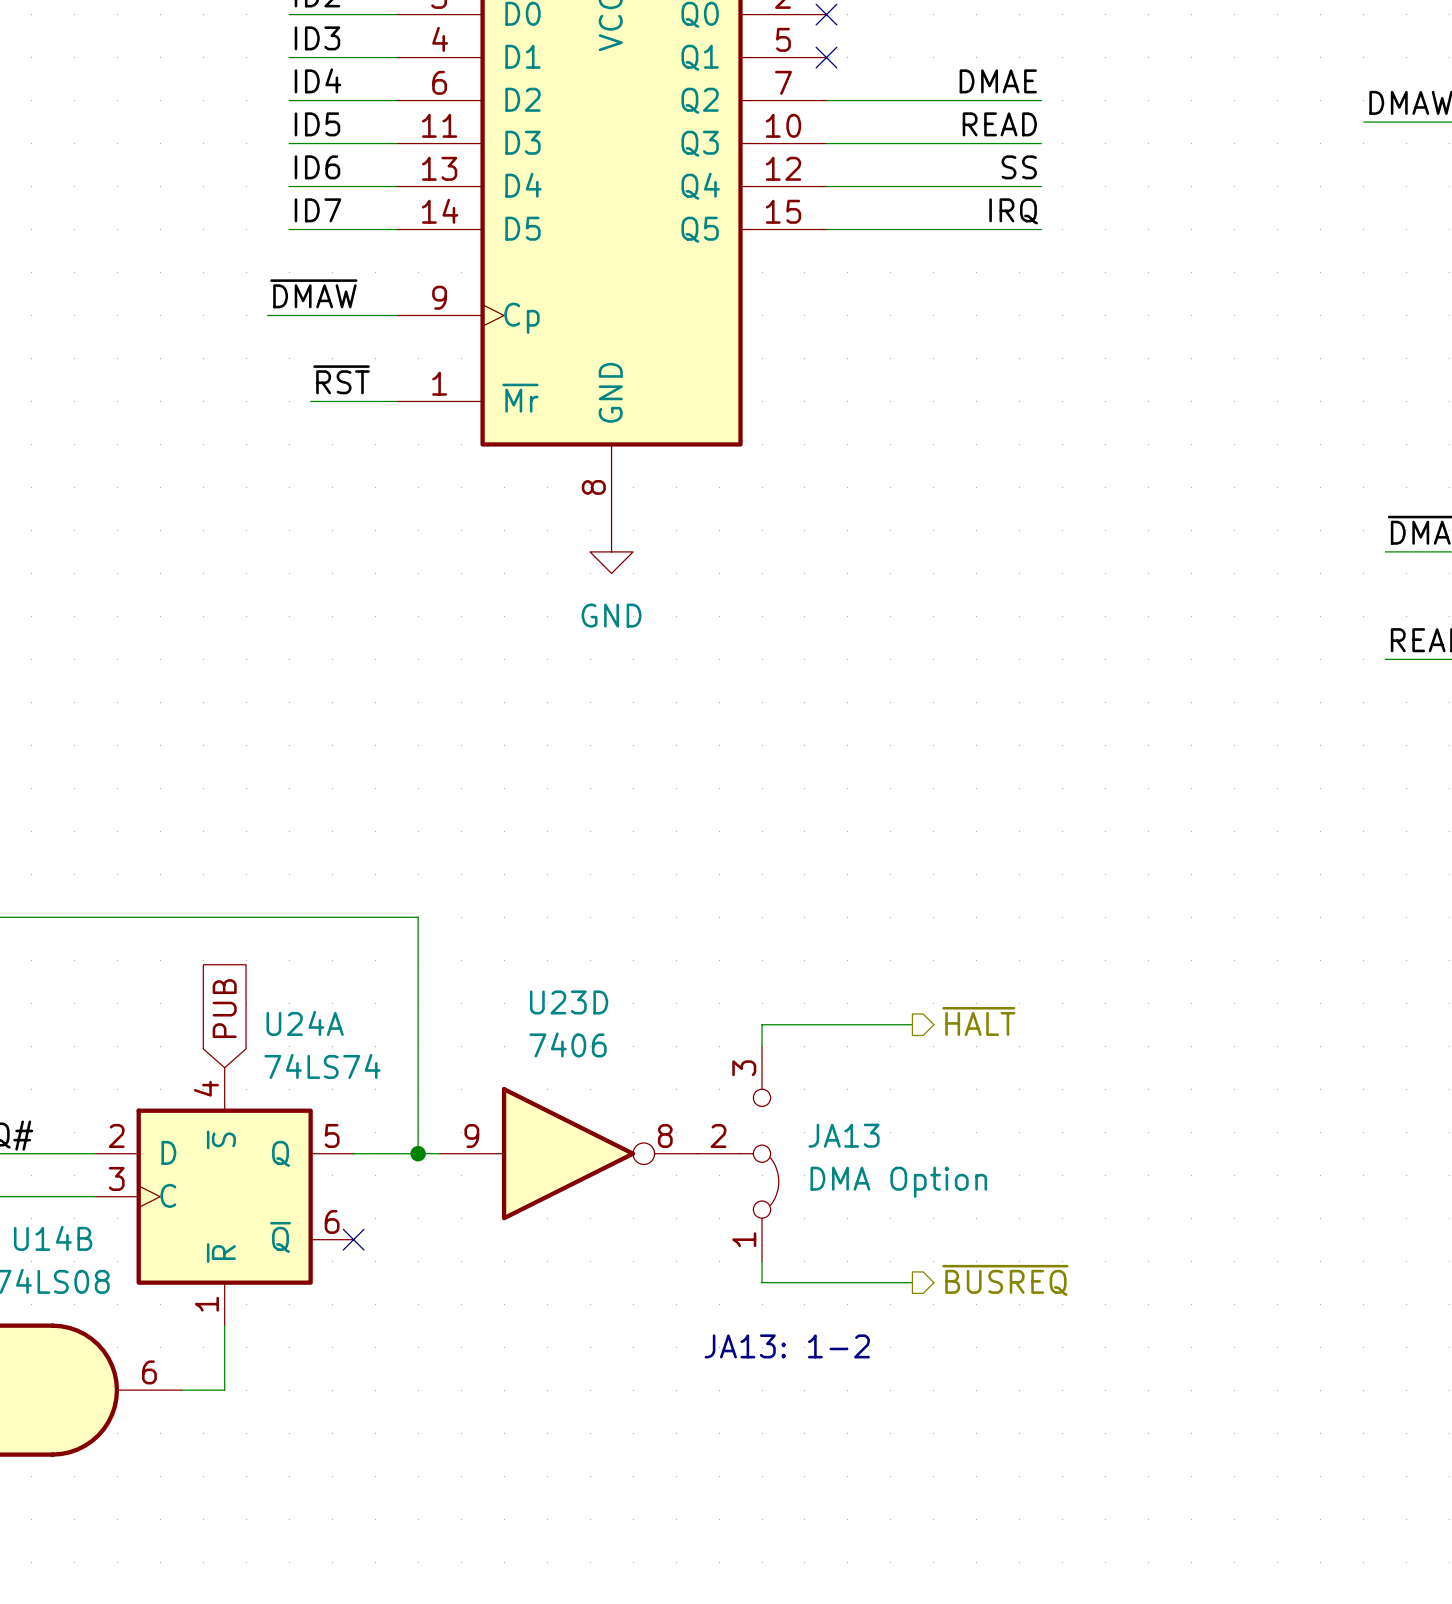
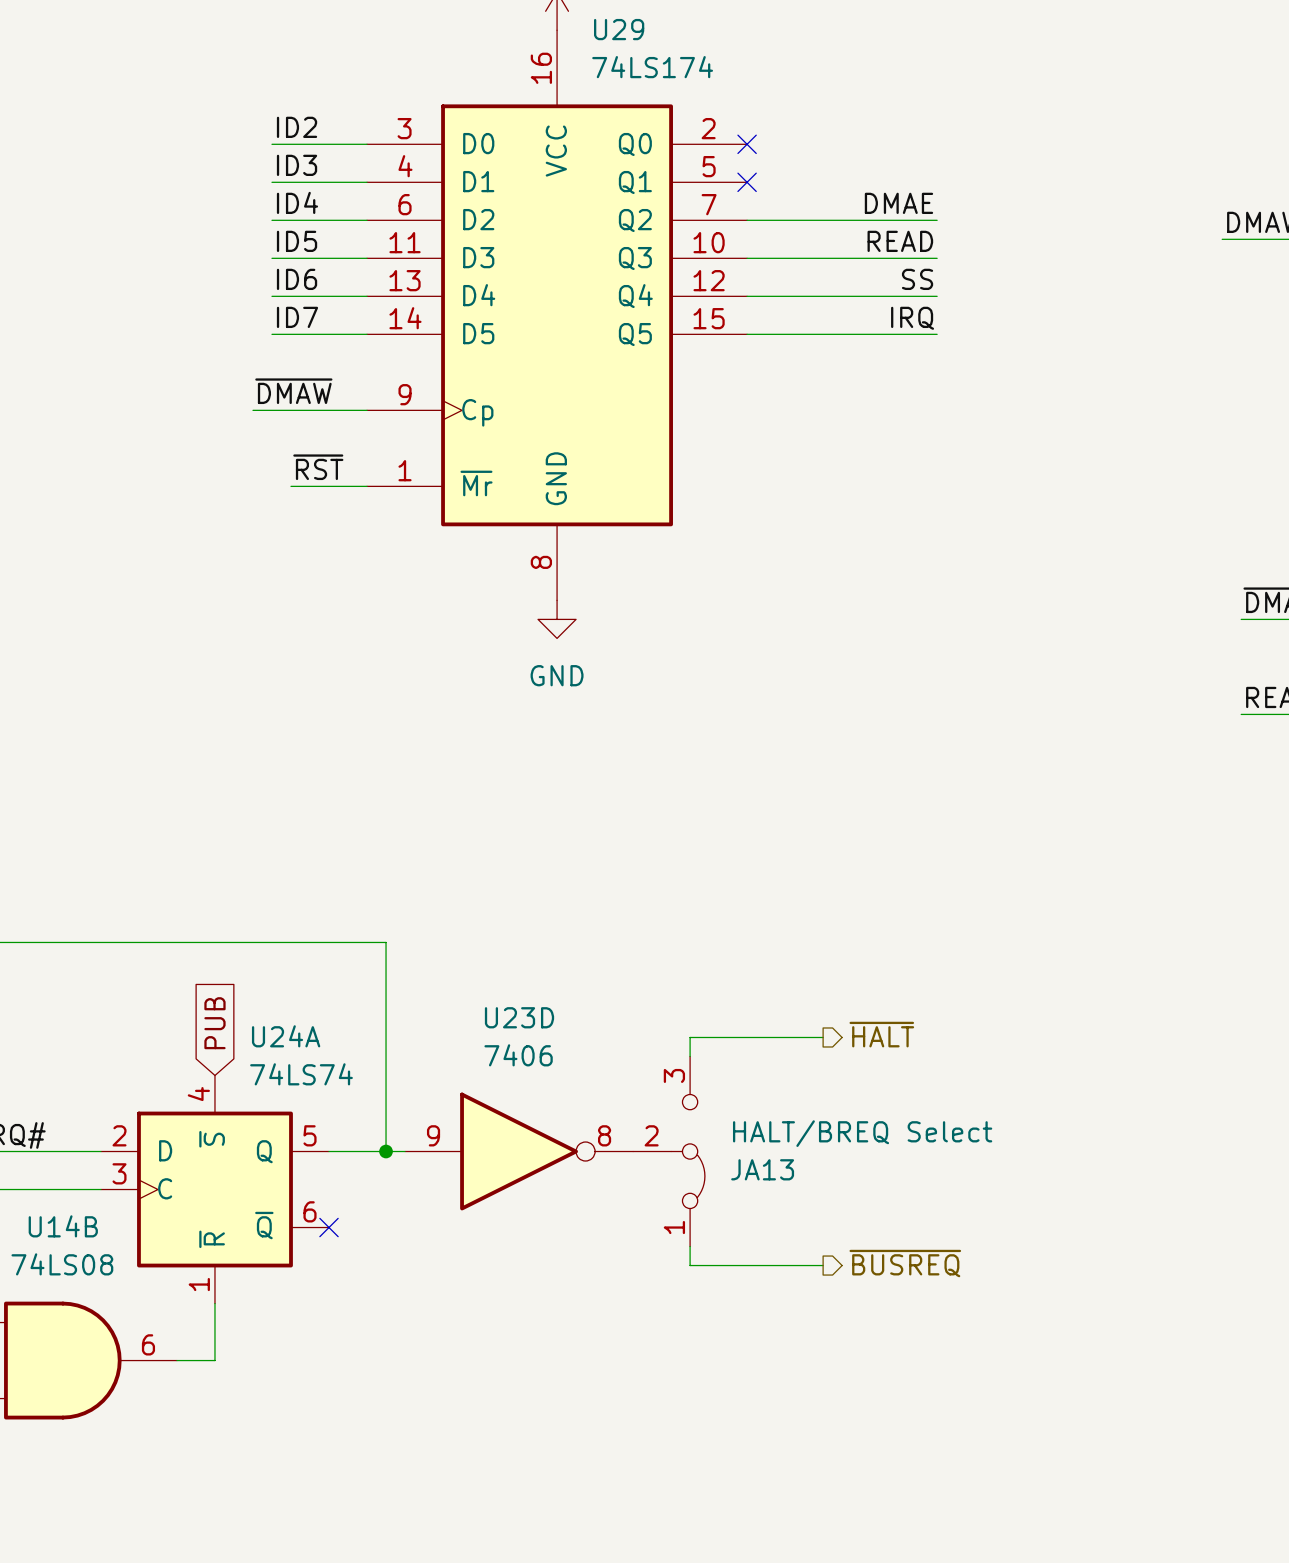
JA13 name position: JA13 (844, 1135) -> JA13 (762, 1169)
JA13 value: DMA Option (898, 1182) -> HALT/BREQ Select (862, 1133)
text: JA13: 1-2 (787, 1346) -> none

